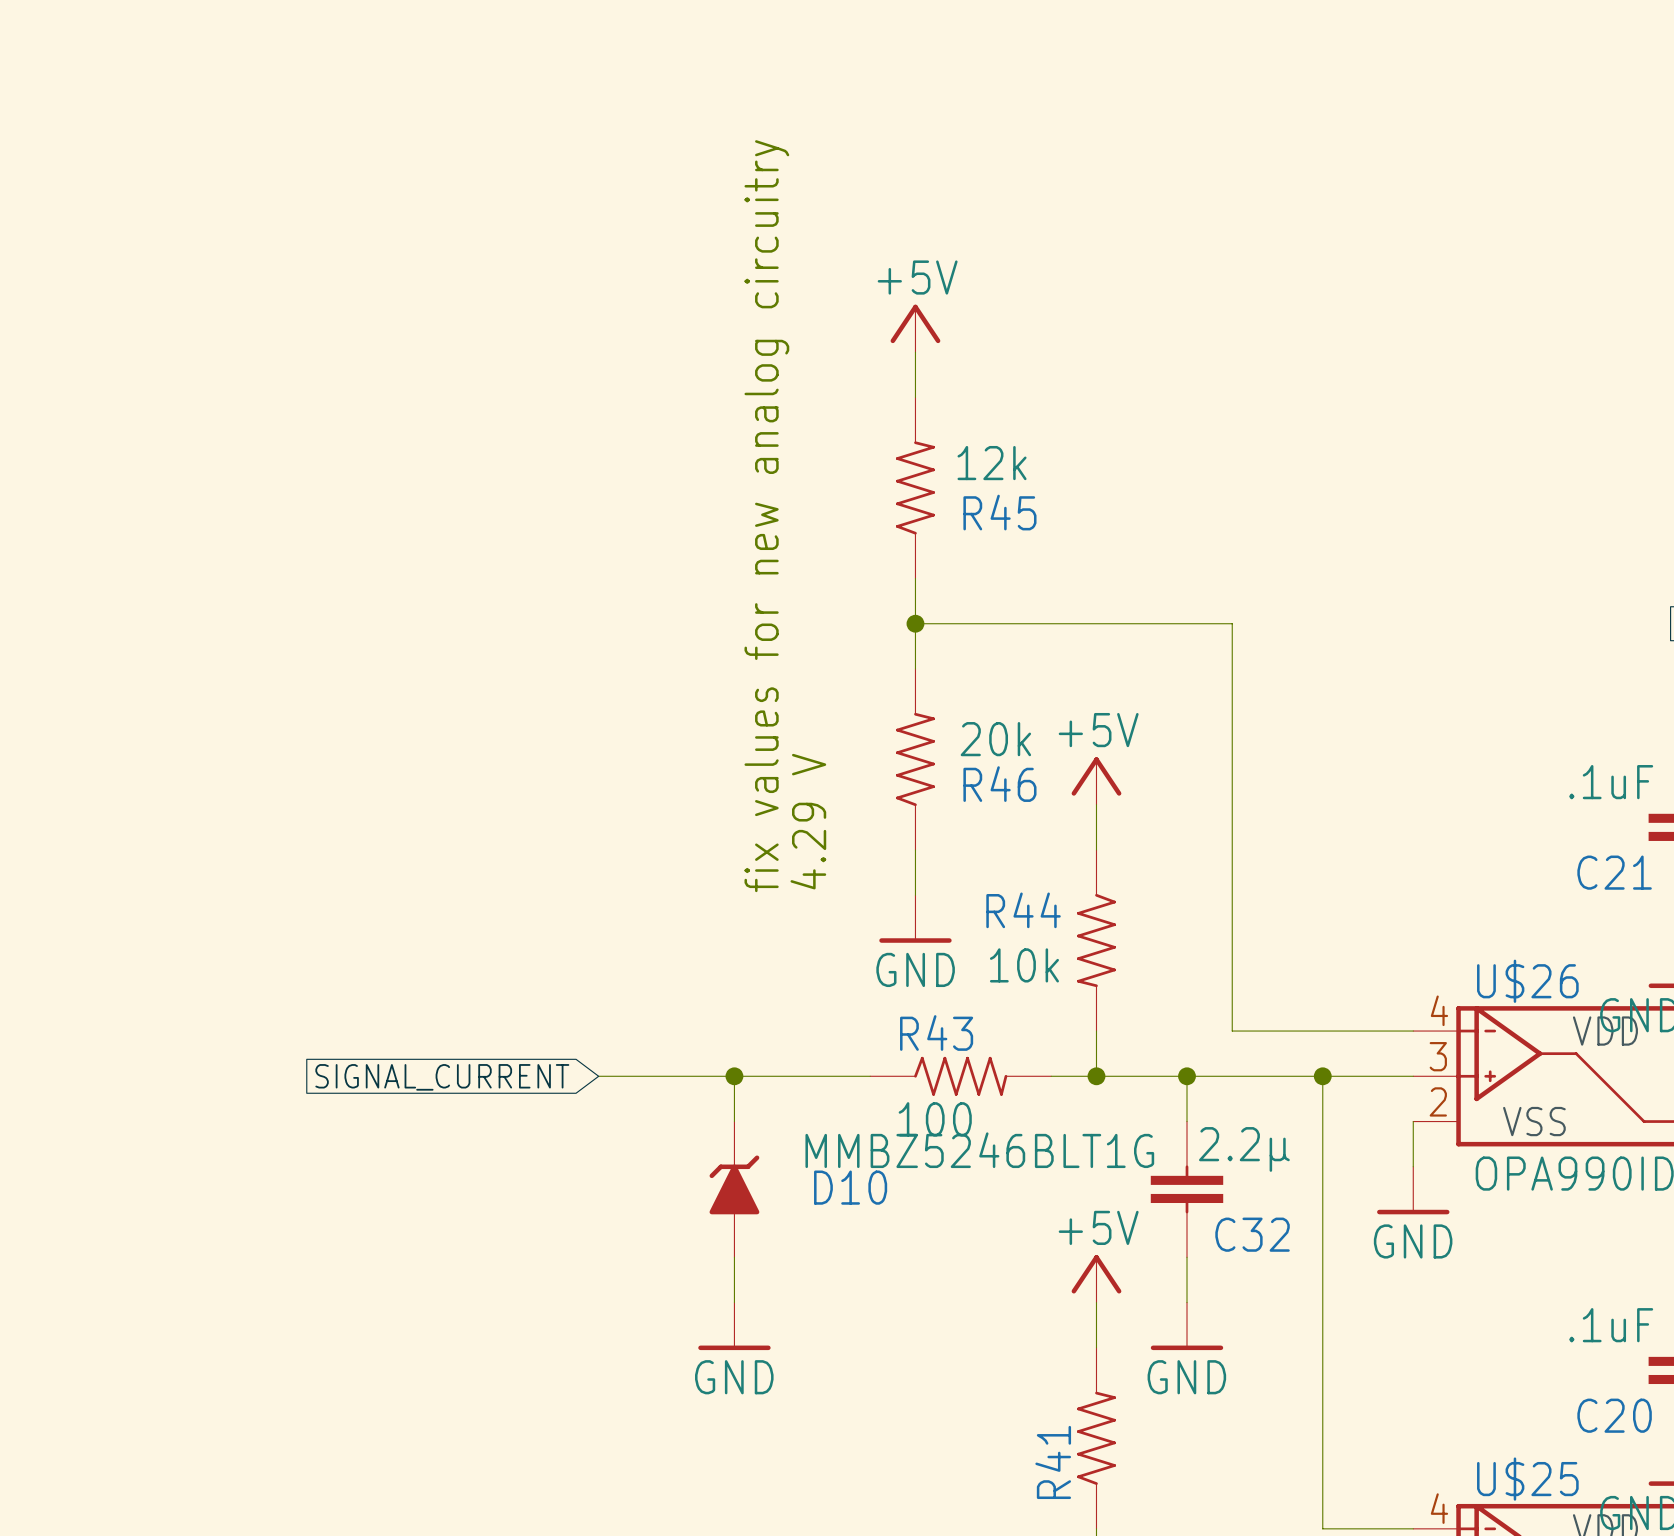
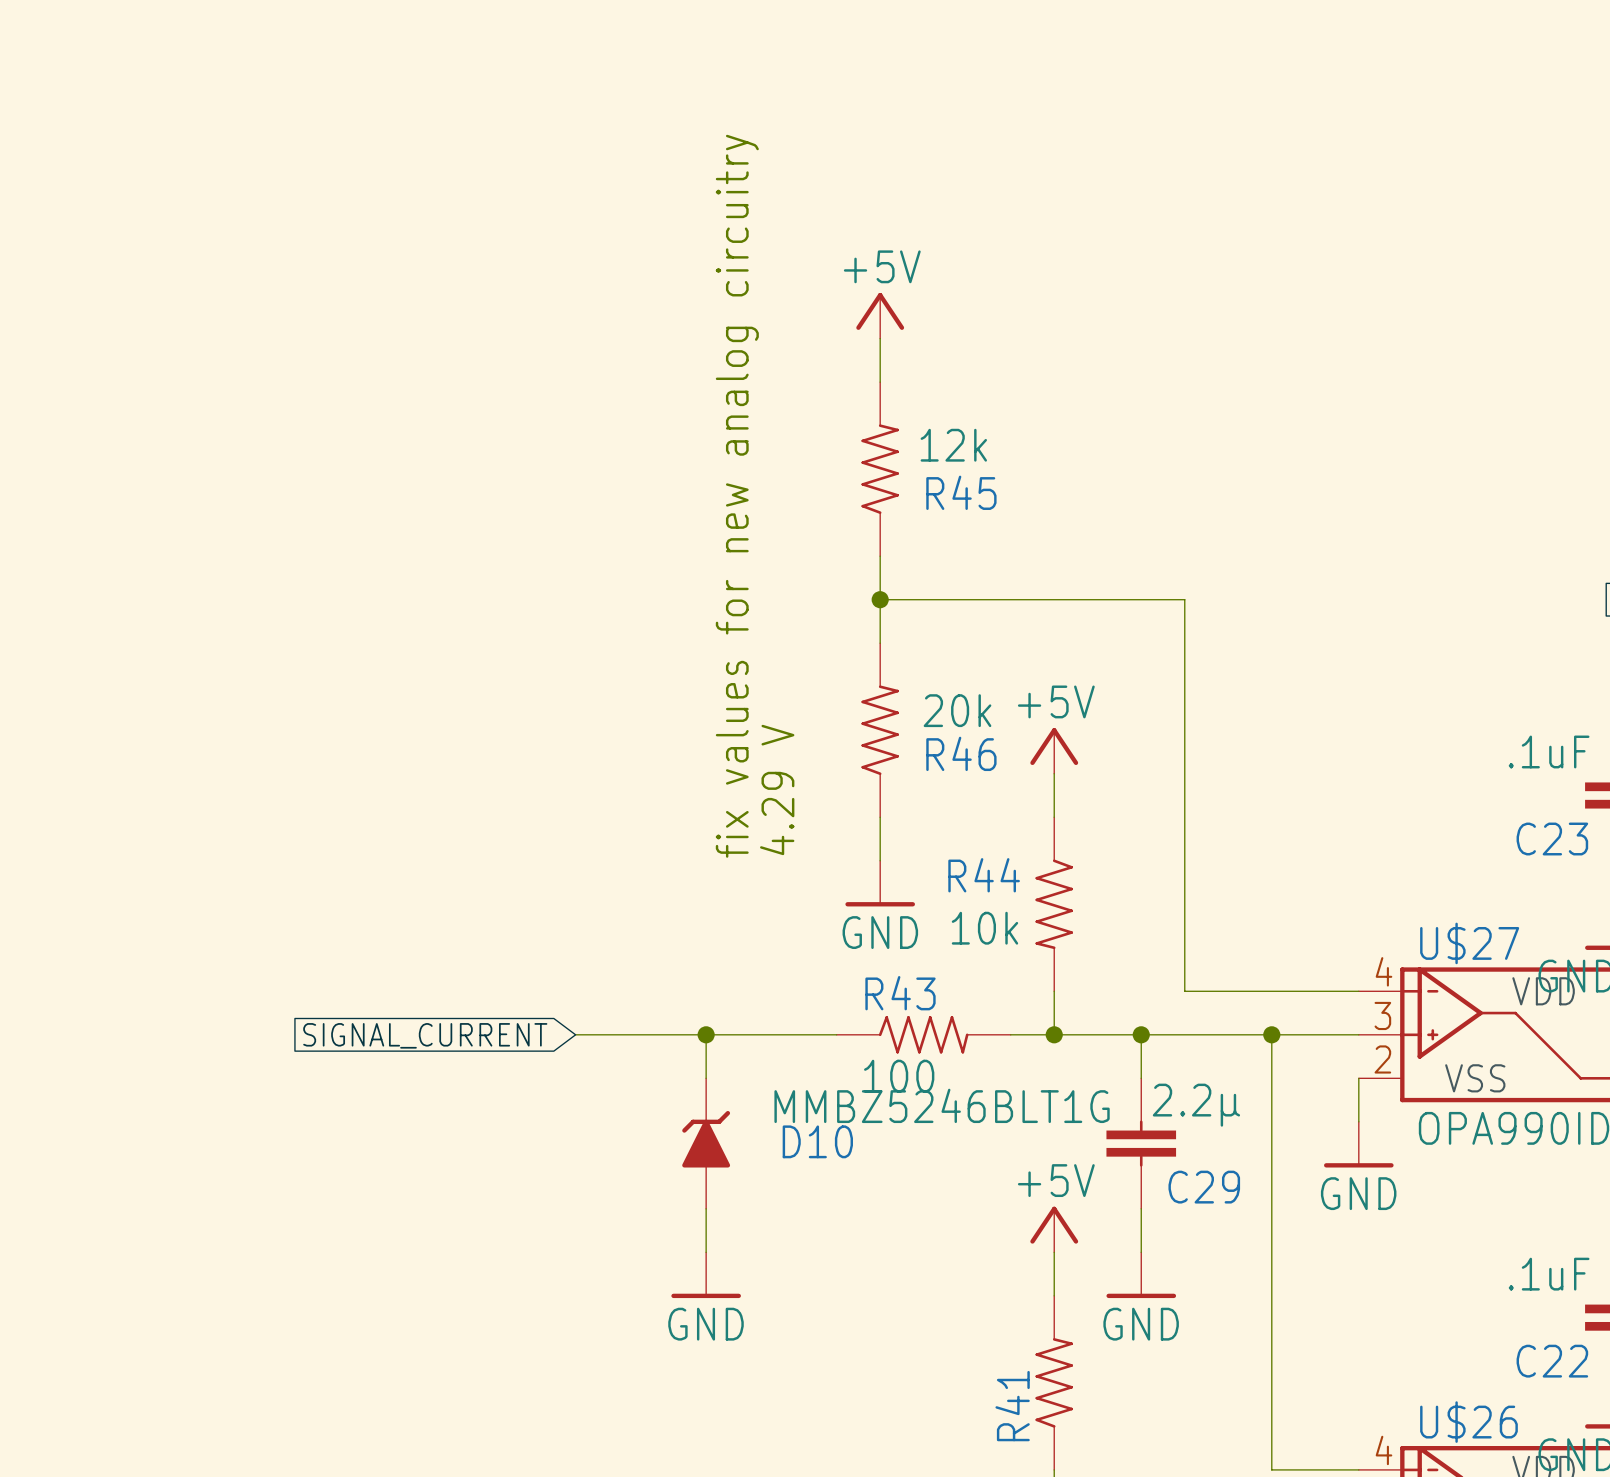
C21 name: C21 (1614, 872) -> C23 (1552, 839)
U$26 name: U$26 (1527, 981) -> U$27 (1469, 943)
C32 name: C32 (1252, 1234) -> C29 (1204, 1187)
C20 name: C20 (1614, 1415) -> C22 (1552, 1361)
U$25 name: U$25 (1527, 1479) -> U$26 (1468, 1422)

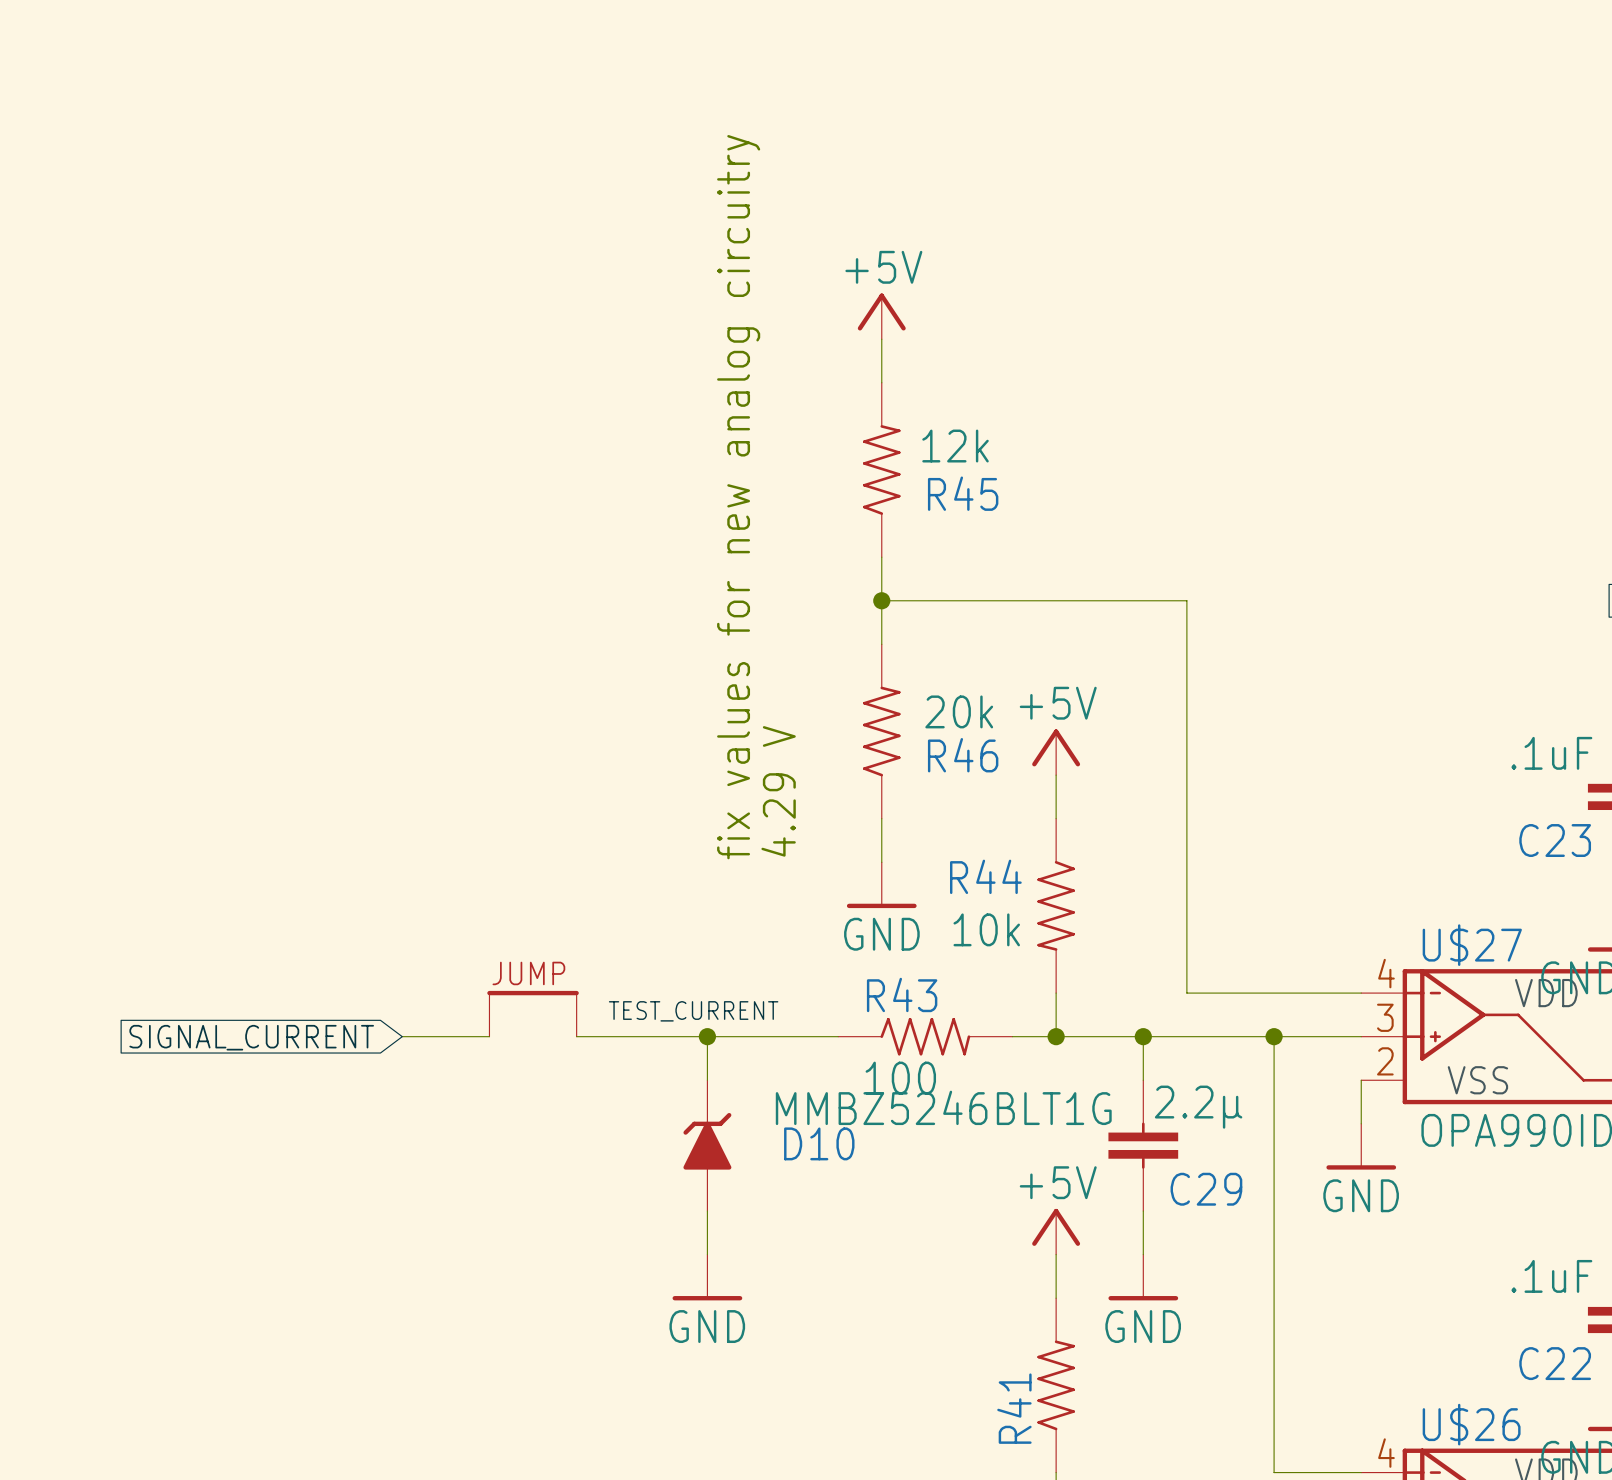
label: none -> TEST_CURRENT (693, 1011)
part: none -> (533, 1013)
wire: none -> (402, 1036) (489, 1036)
global label position: SIGNAL_CURRENT (425, 1035) -> SIGNAL_CURRENT (251, 1037)

